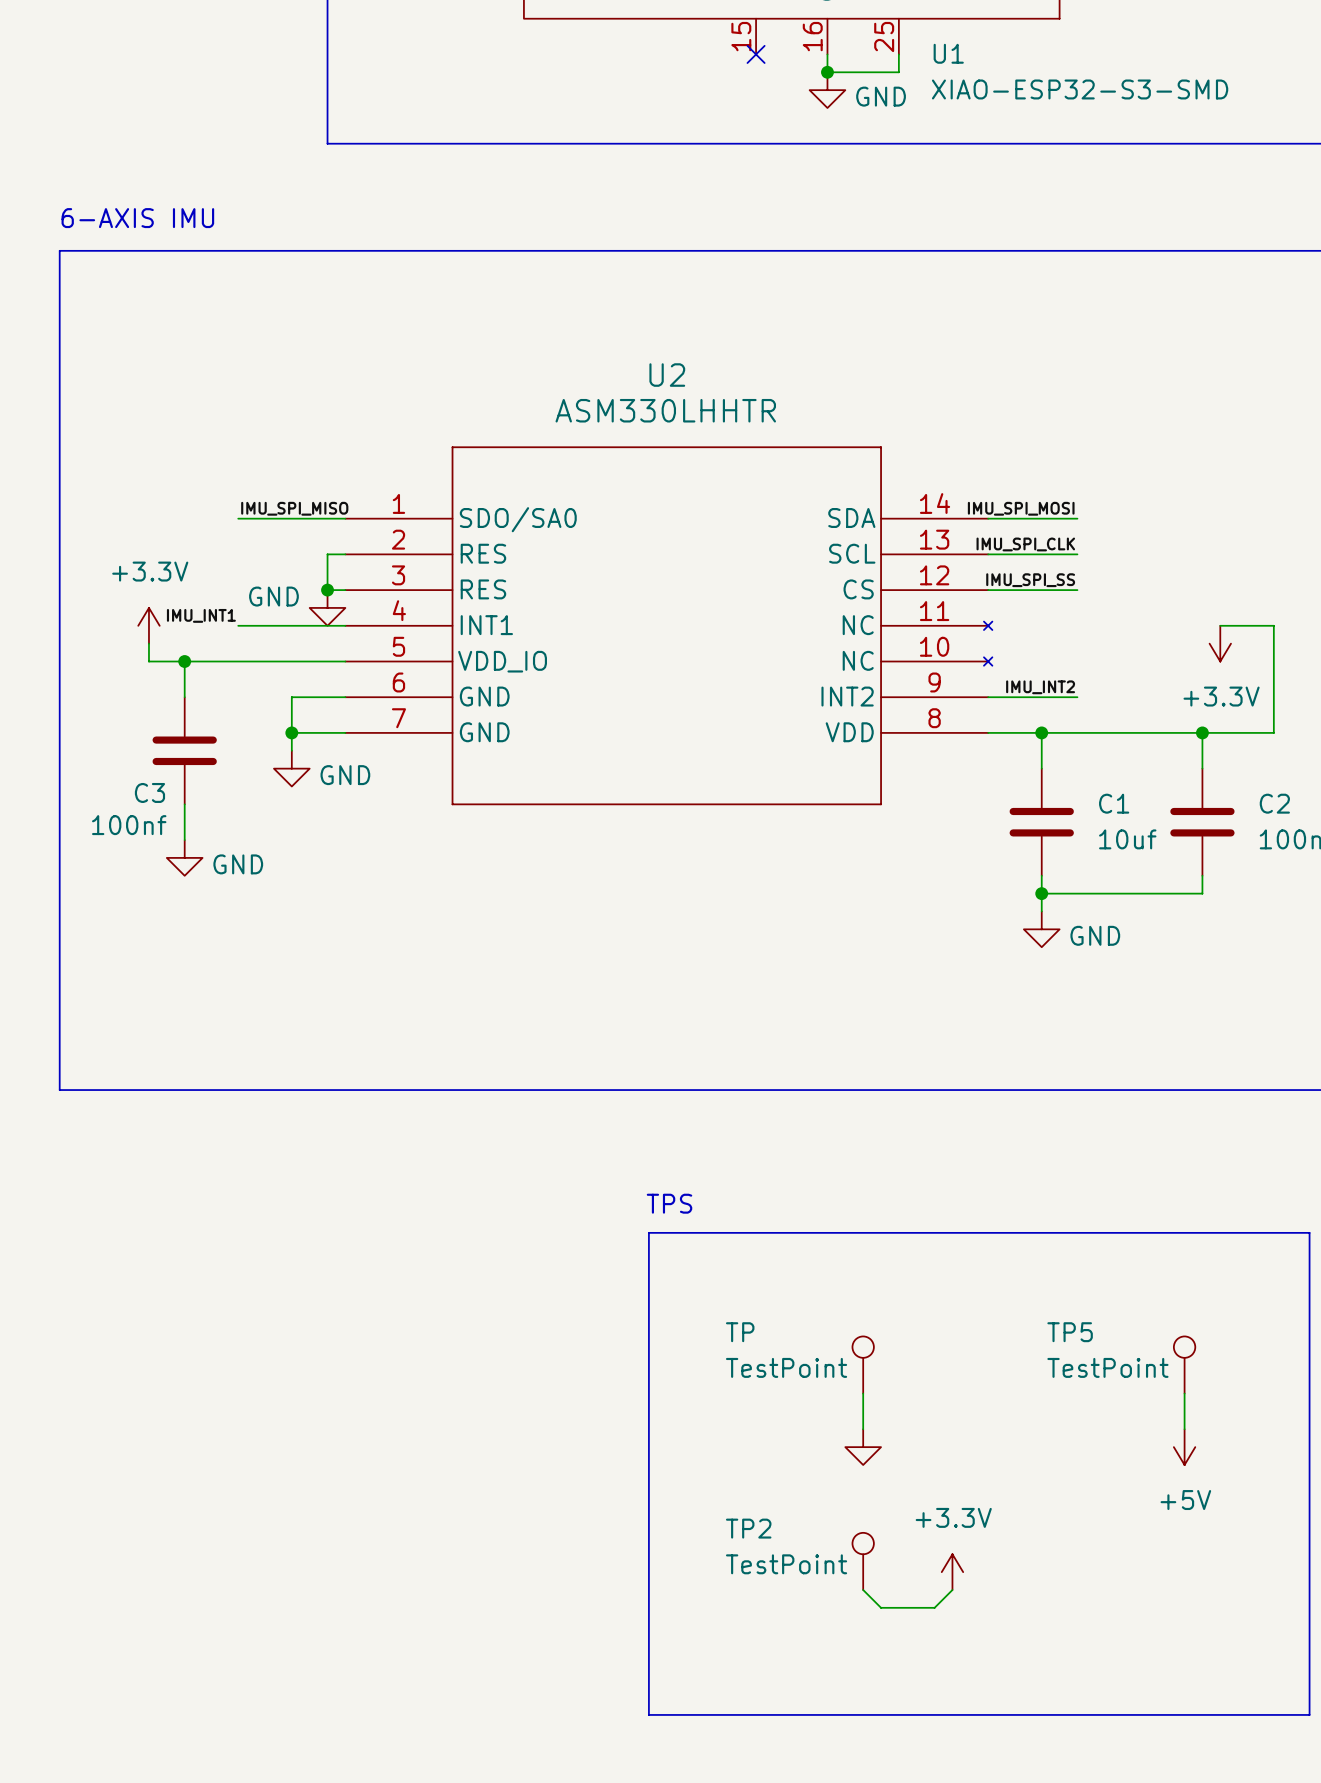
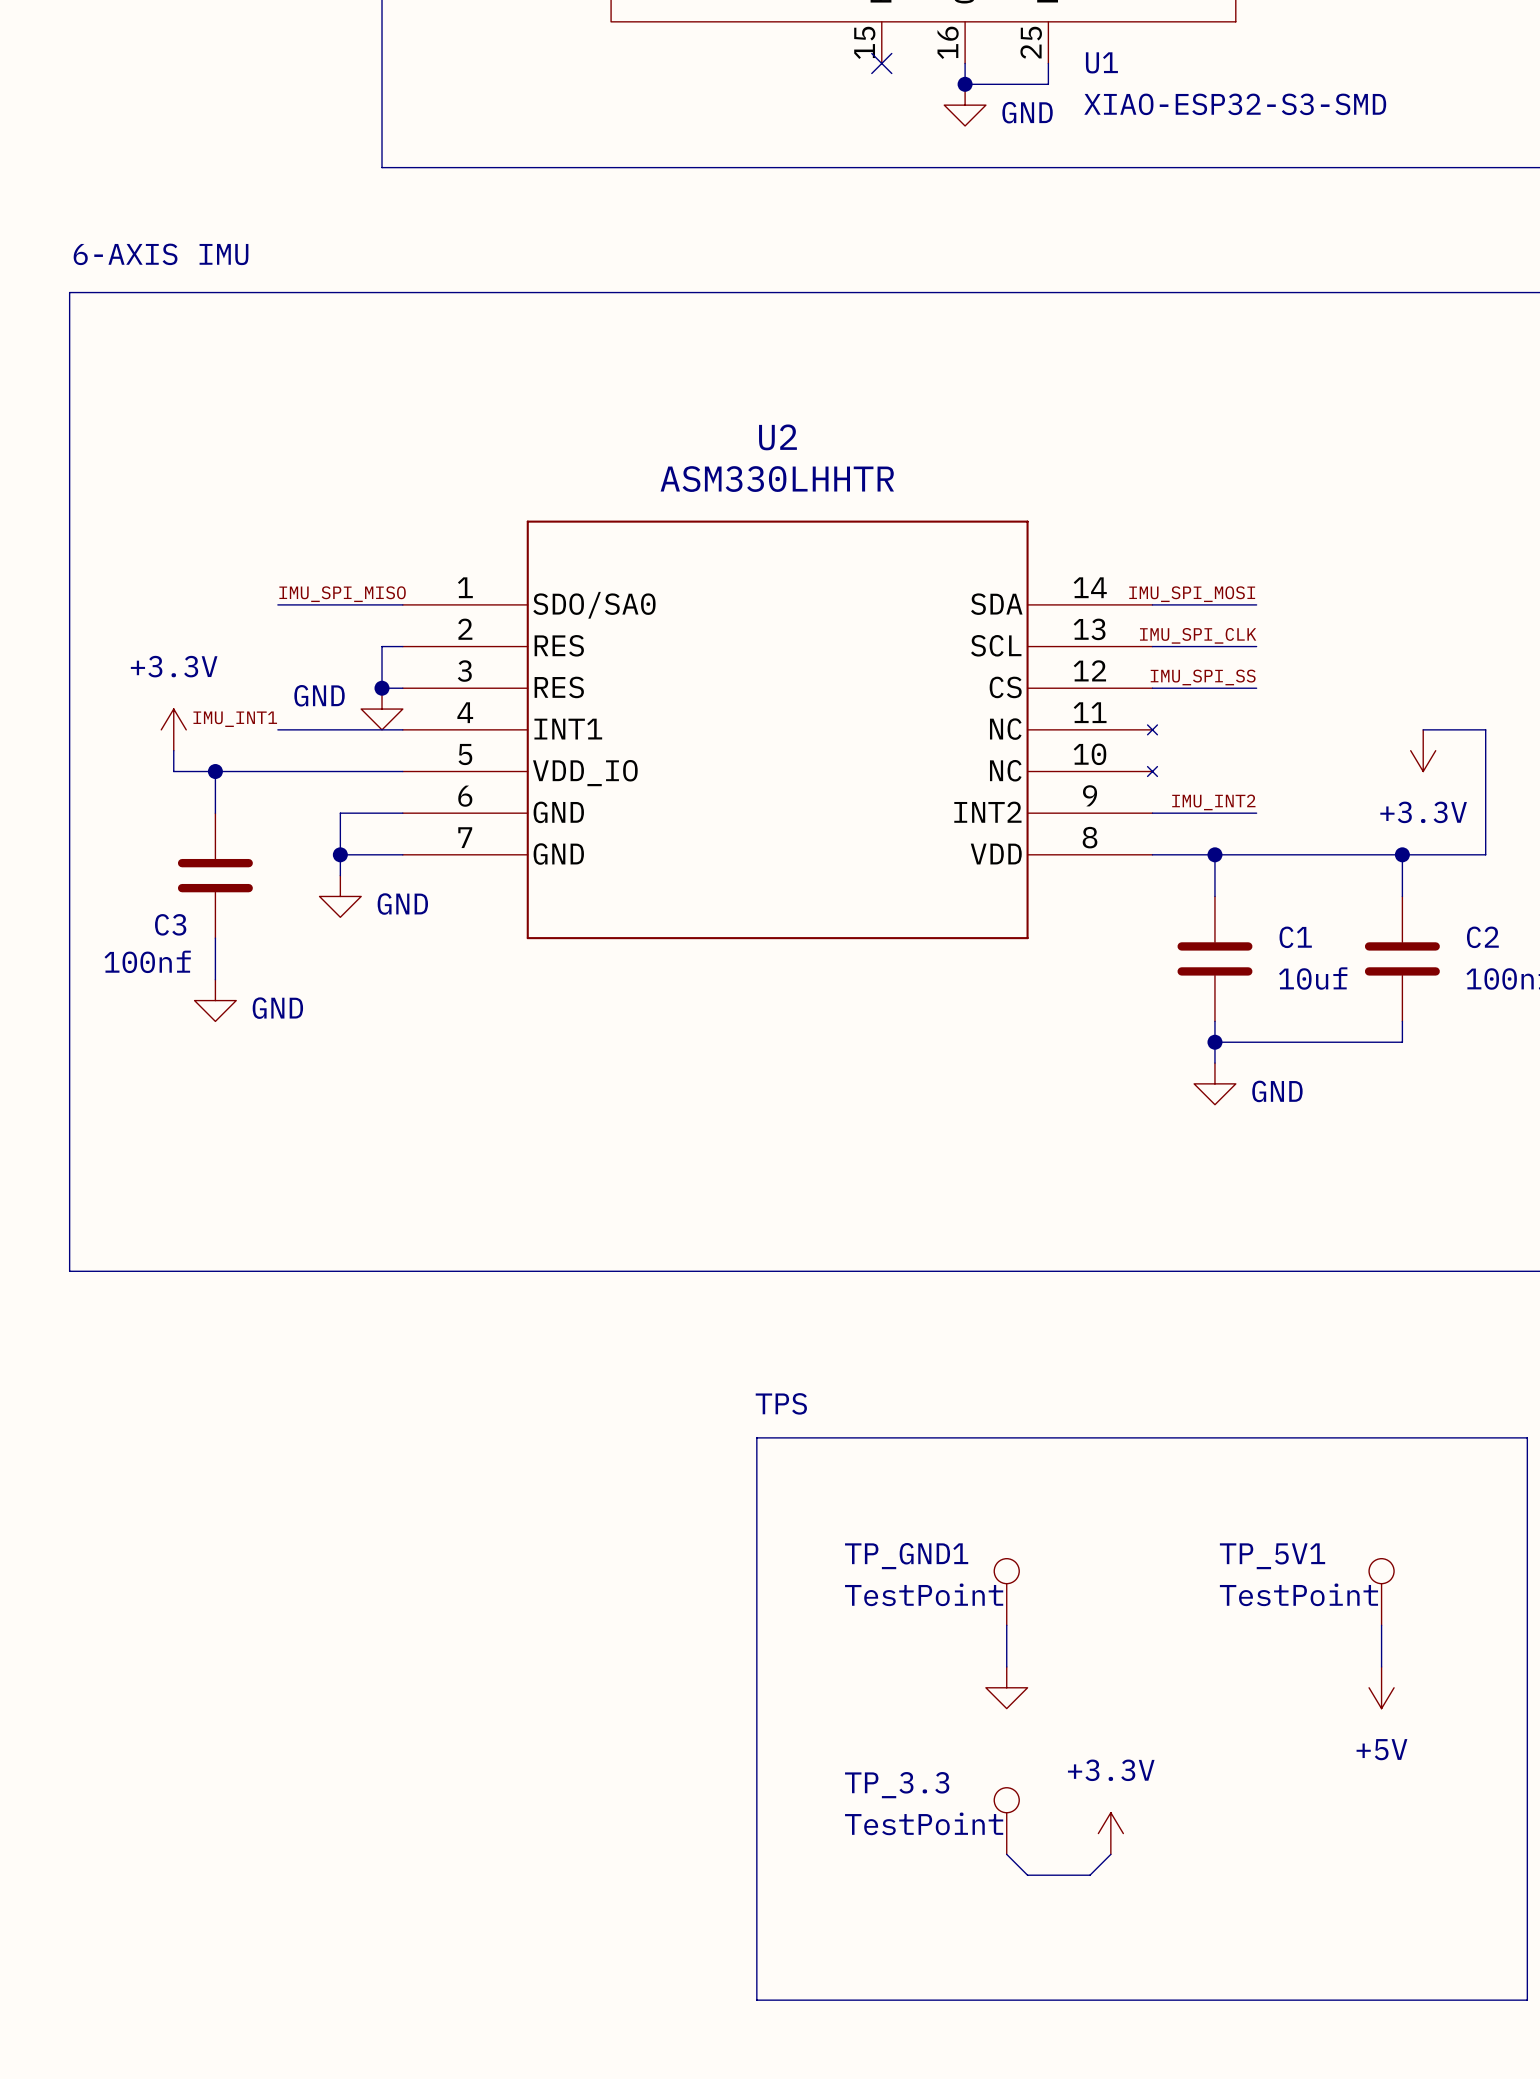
TP name: TP (740, 1332) -> TP_GND1 (906, 1556)
TP5 name: TP5 (1070, 1332) -> TP_5V1 (1272, 1556)
TP2 name: TP2 (748, 1528) -> TP_3.3 (897, 1785)

